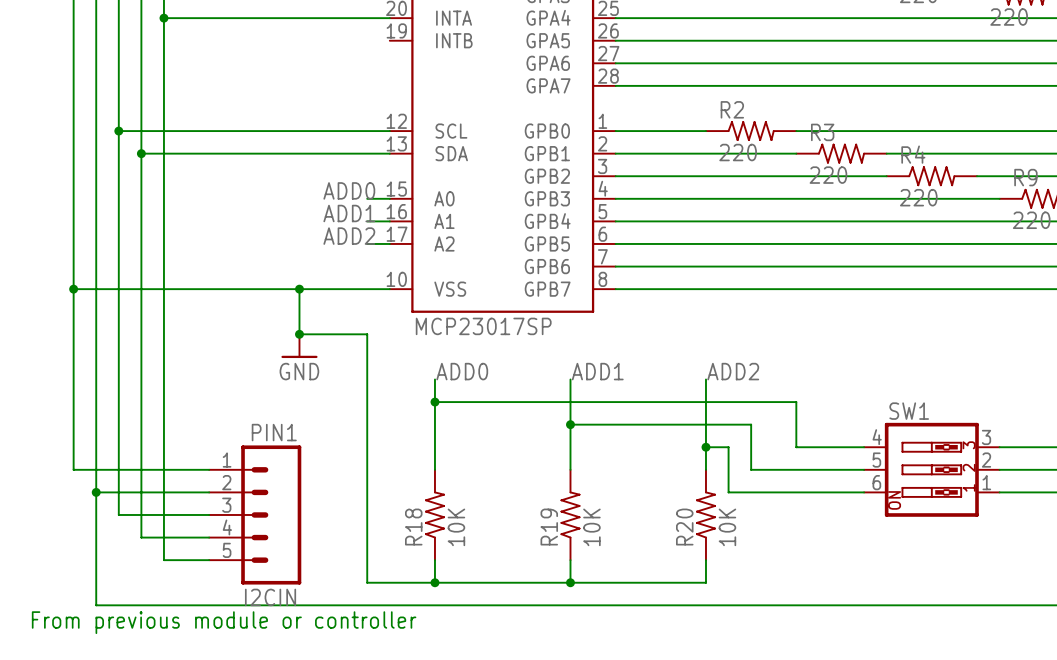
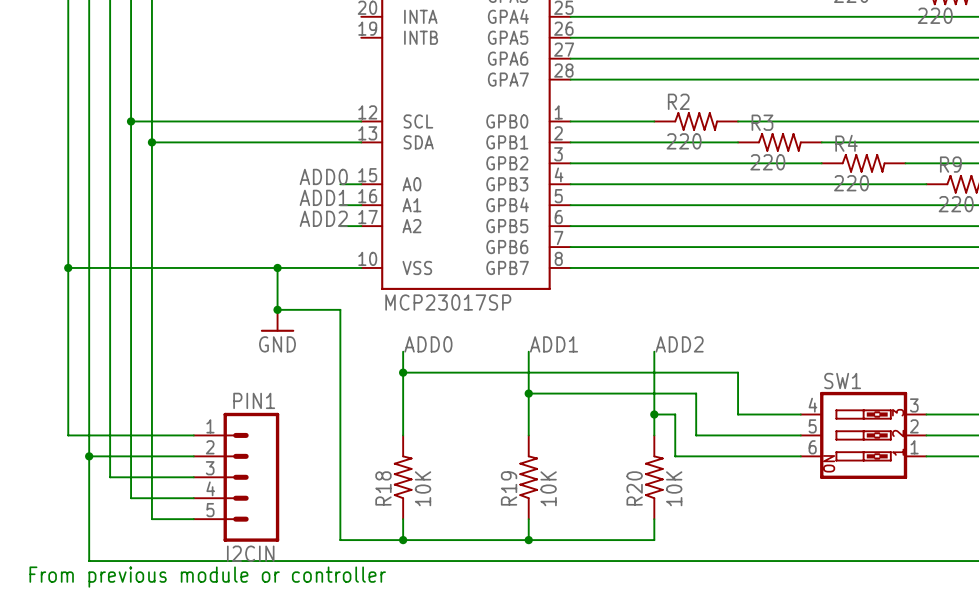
wire: (163, 18) (389, 18) -> none
junction: (163, 18) -> none
wire: (118, 131) (141, 131) -> none
junction: (118, 131) -> none
junction: none -> (131, 121)
wire: (141, 153) (163, 153) -> none
junction: (141, 153) -> none
junction: none -> (151, 142)

